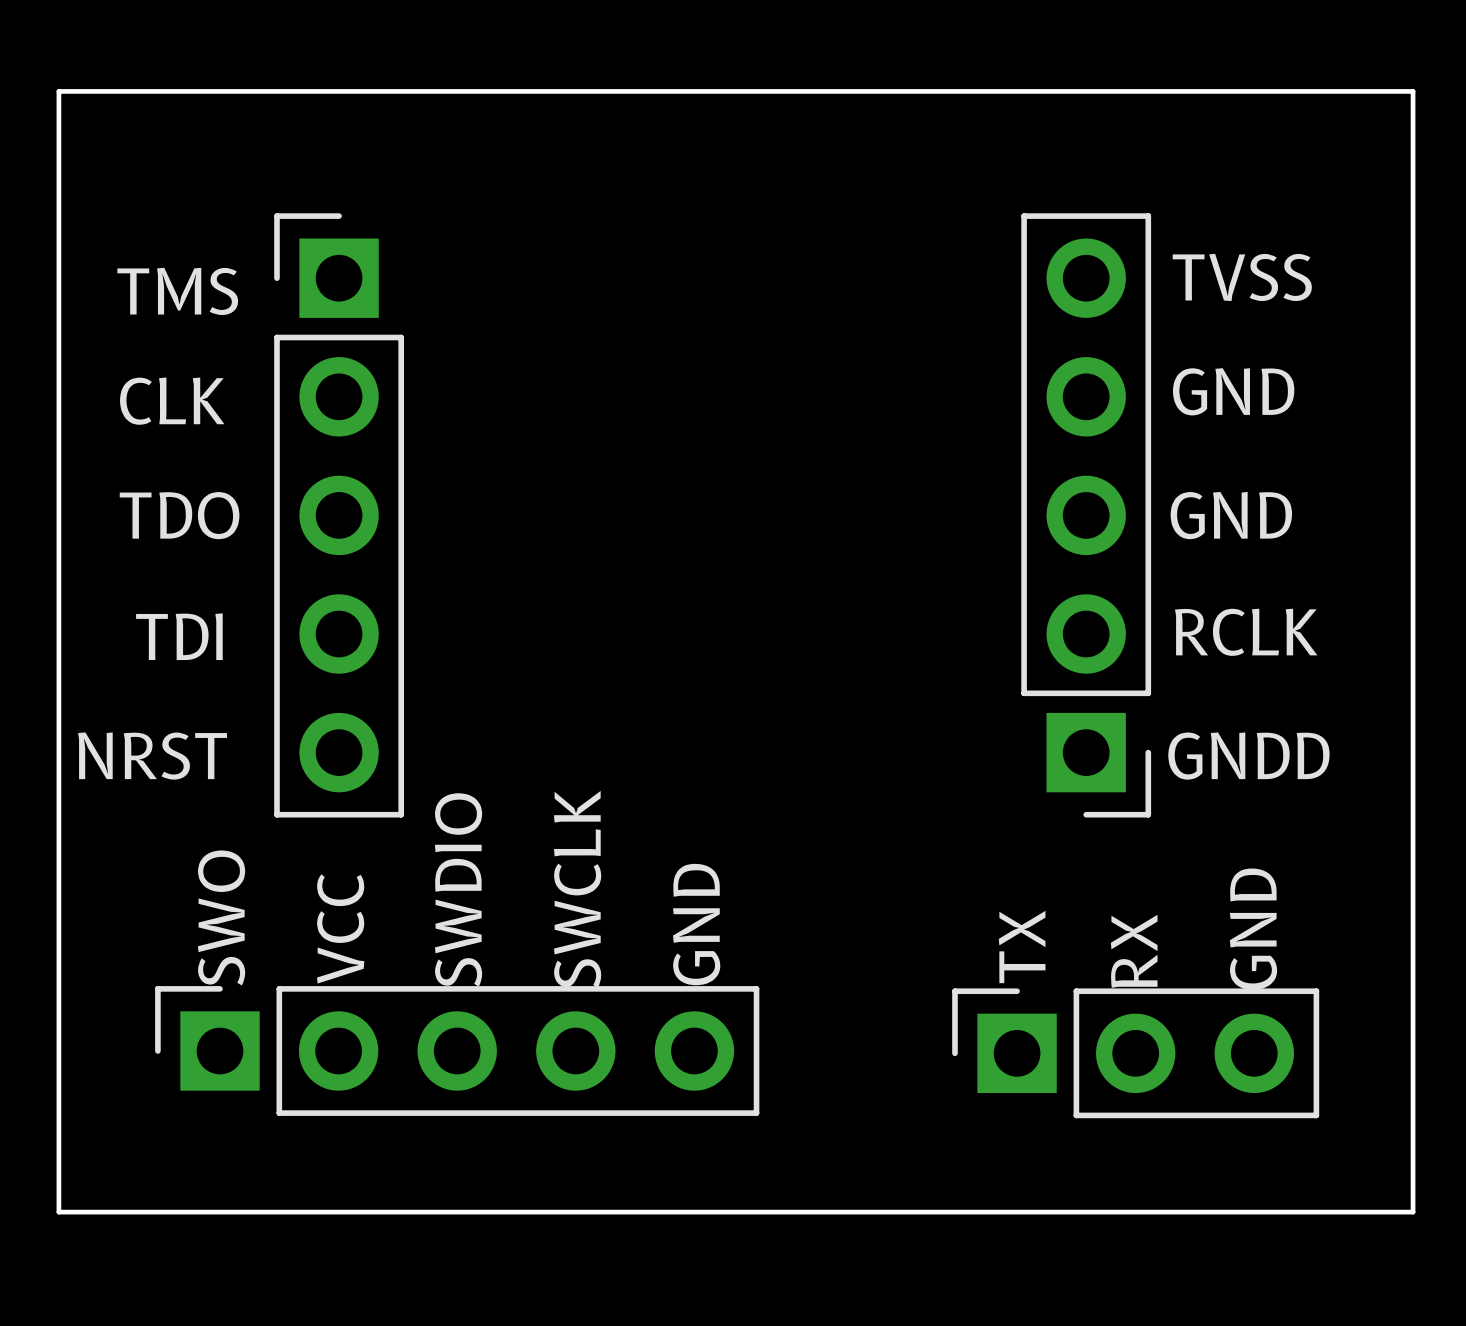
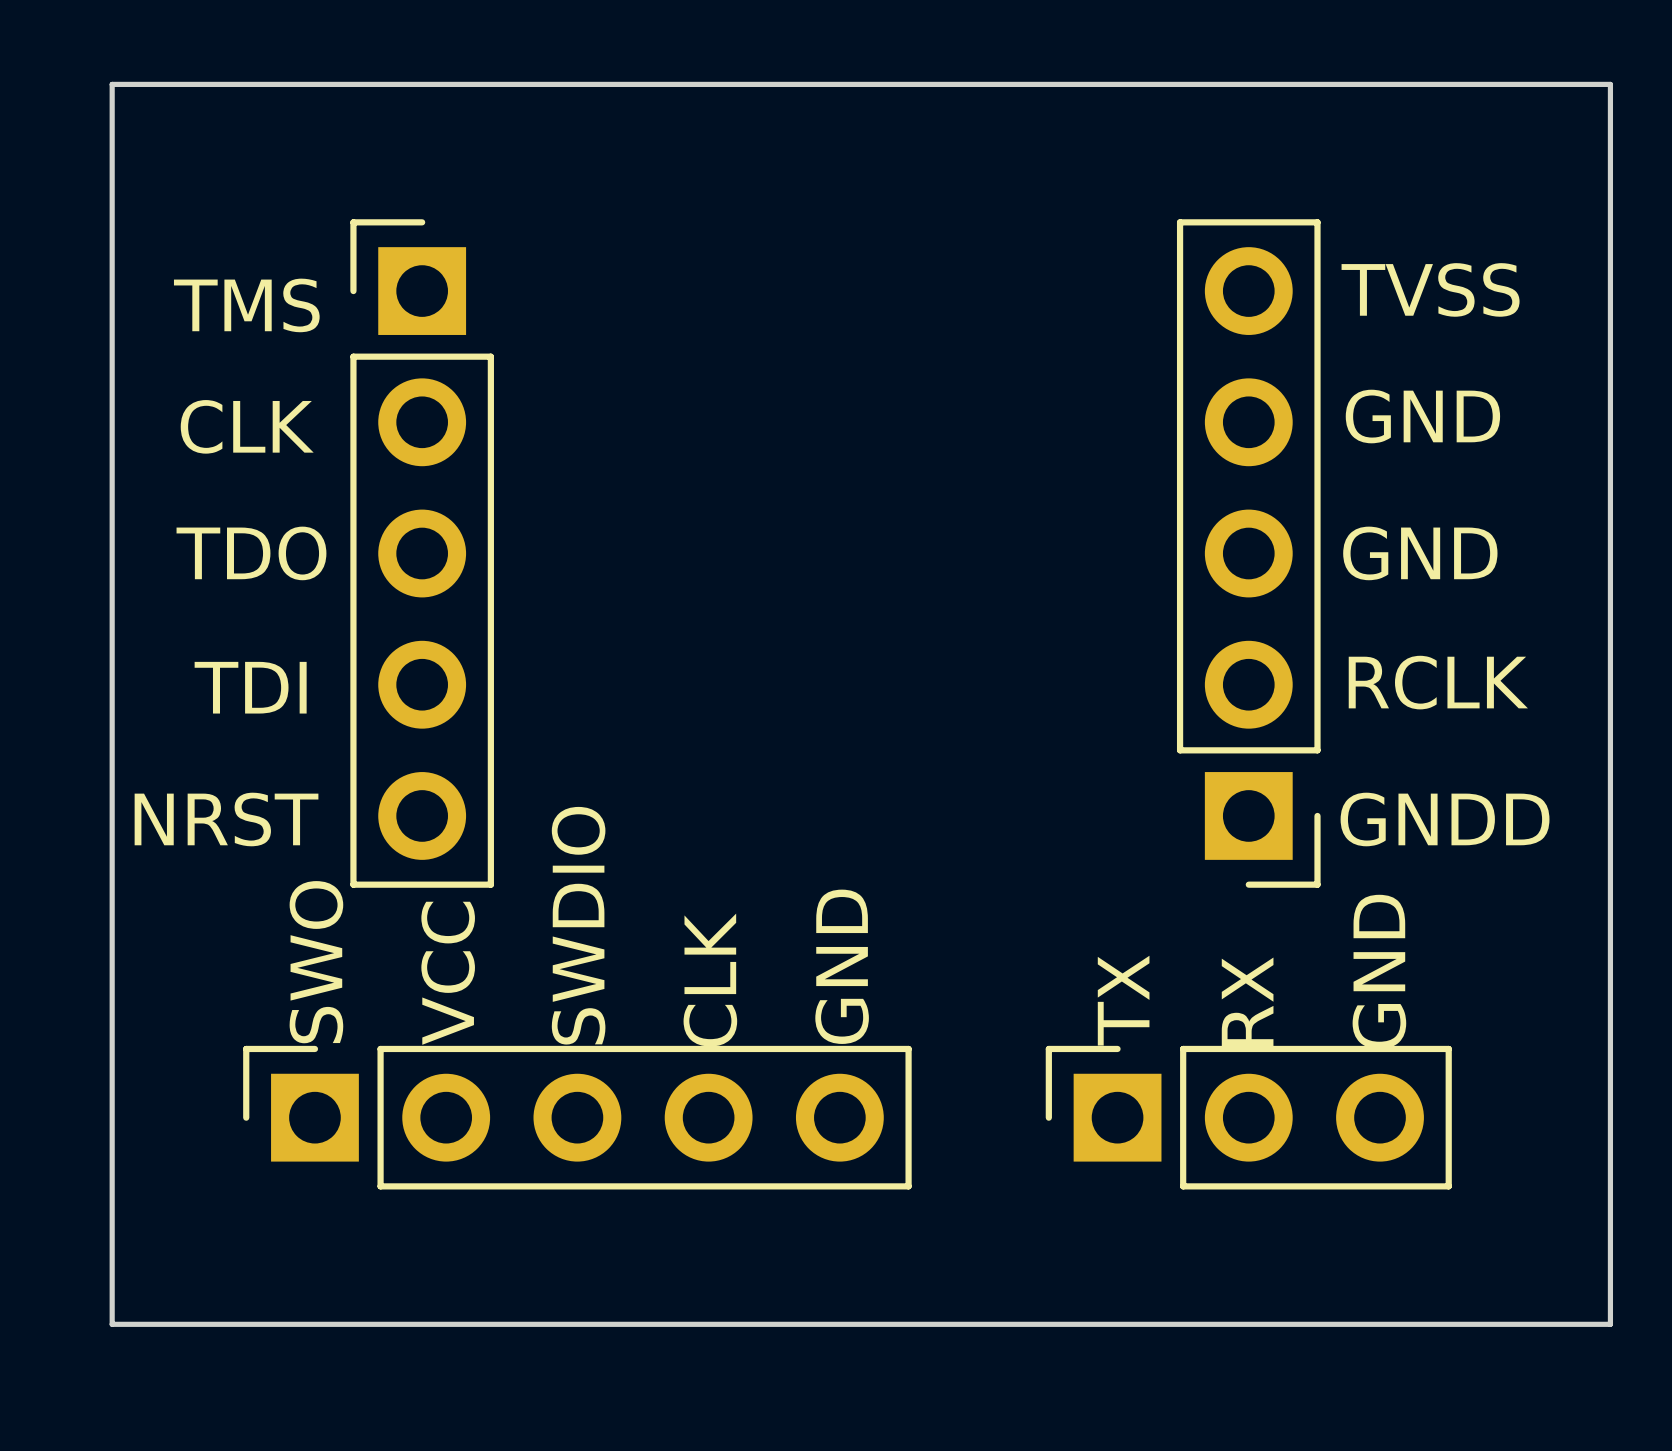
text position: SWDIO (458, 889) -> SWDIO (578, 925)
text: SWCLK (577, 889) -> CLK (710, 980)
text position: SWO (221, 917) -> SWO (316, 962)
text position: GND (696, 924) -> GND (842, 966)
text position: VCC (340, 928) -> VCC (448, 973)
text position: GND (1253, 929) -> GND (1379, 971)
text position: TX (1022, 947) -> TX (1123, 1000)
text position: RX (1134, 951) -> RX (1247, 1001)
part position: (457, 1050) -> (577, 1117)
part position: (1135, 1053) -> (1248, 1117)

